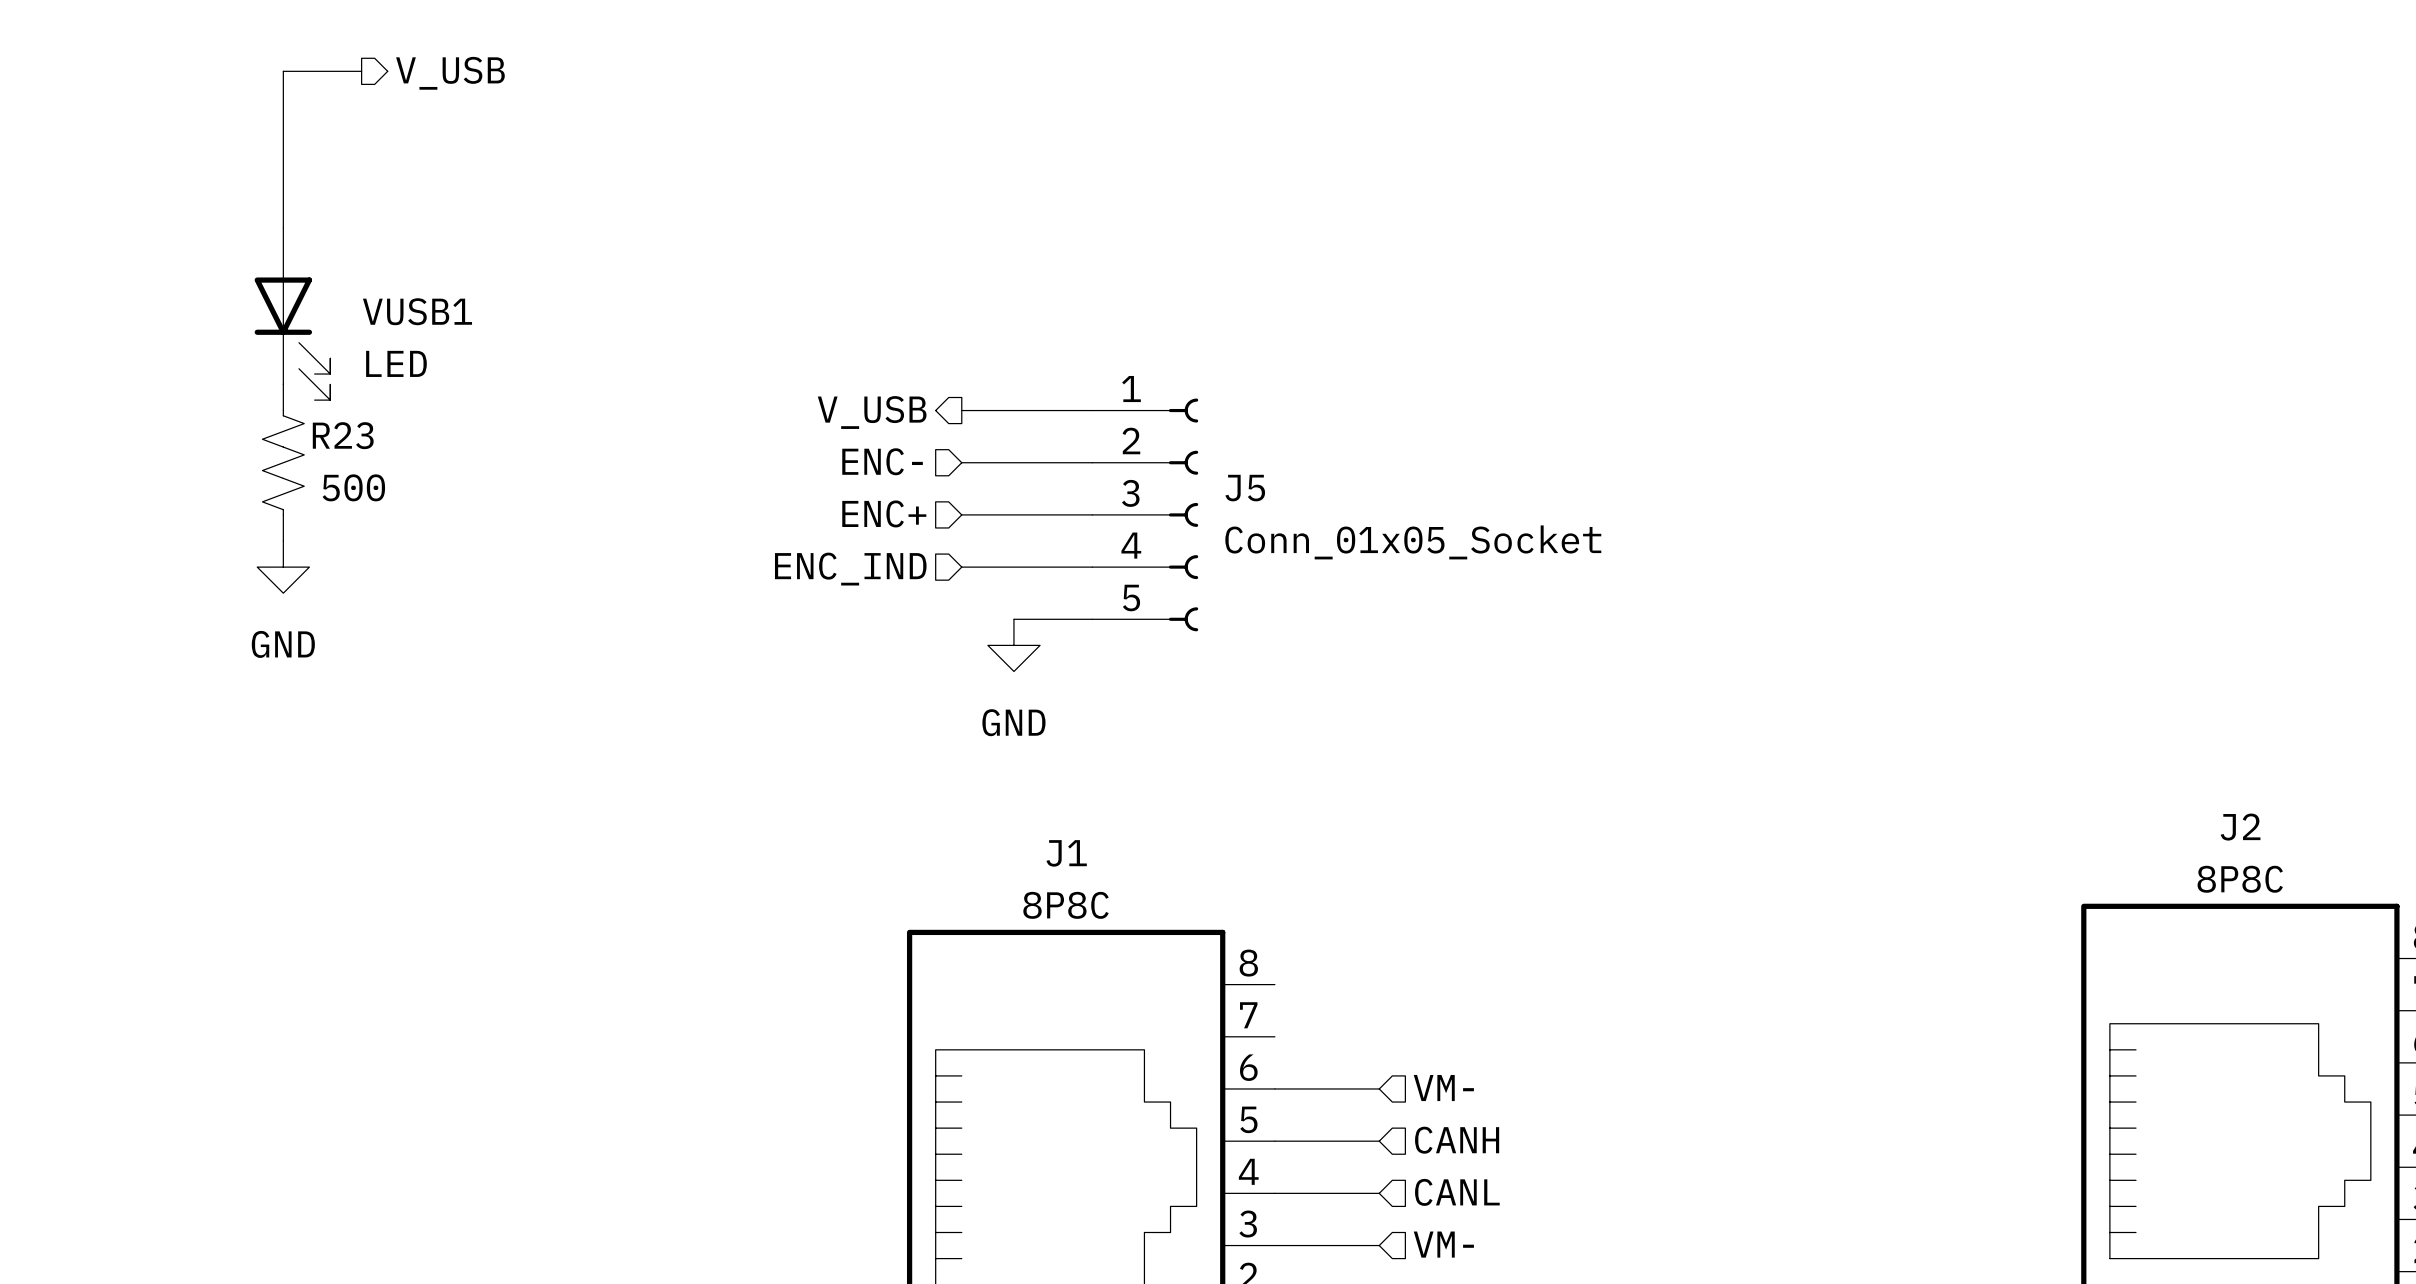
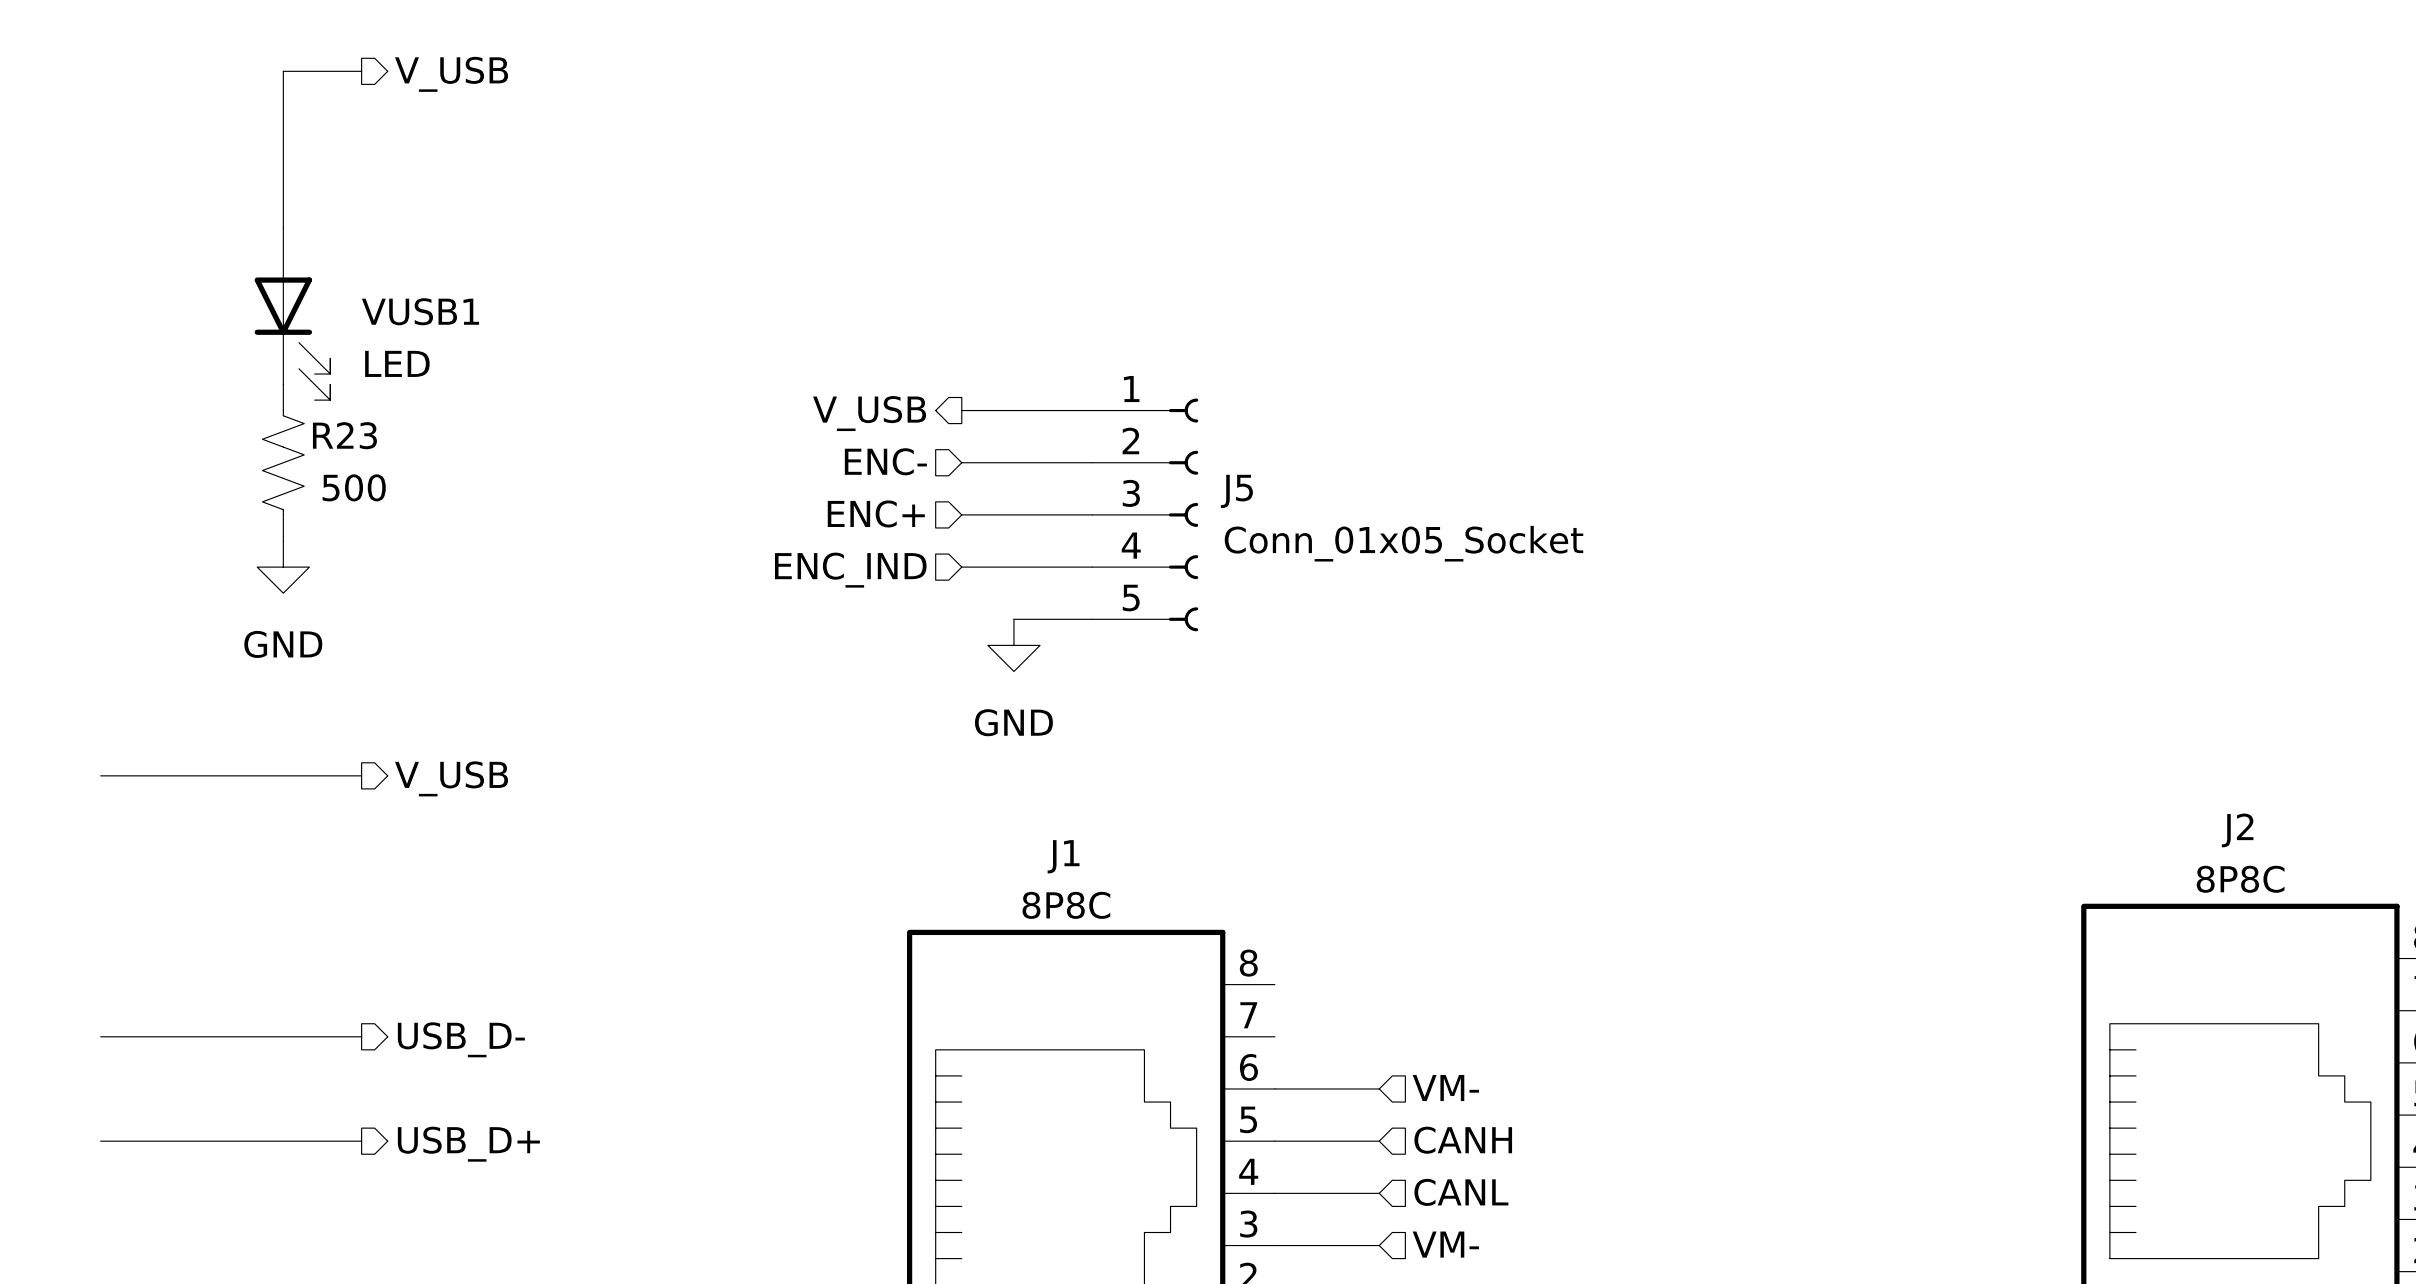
wire: none -> (100, 775) (361, 775)
hierarchical label: none -> V_USB (451, 778)
wire: none -> (100, 1036) (361, 1036)
hierarchical label: none -> USB_D- (461, 1039)
wire: none -> (100, 1141) (361, 1141)
hierarchical label: none -> USB_D+ (468, 1144)

